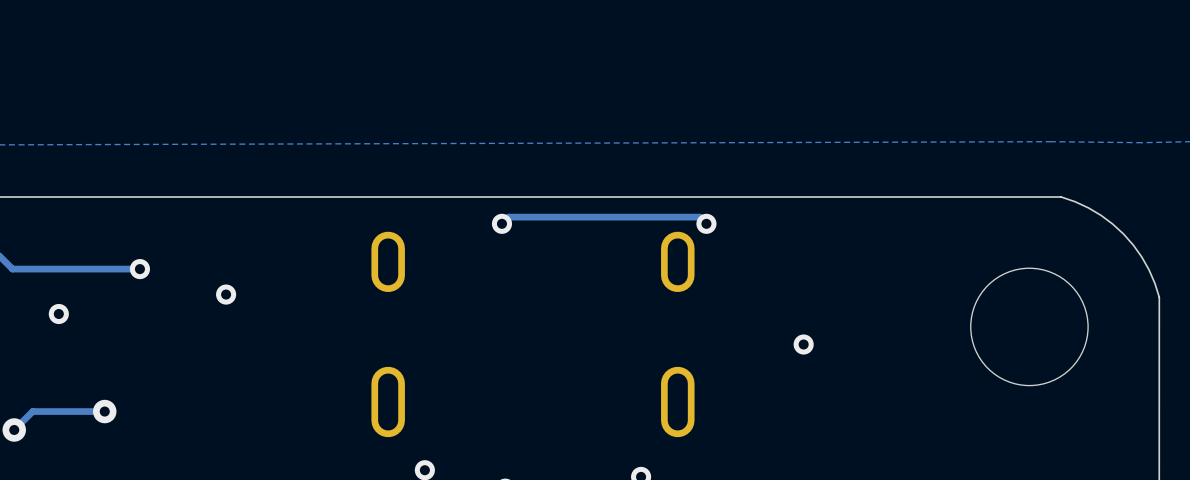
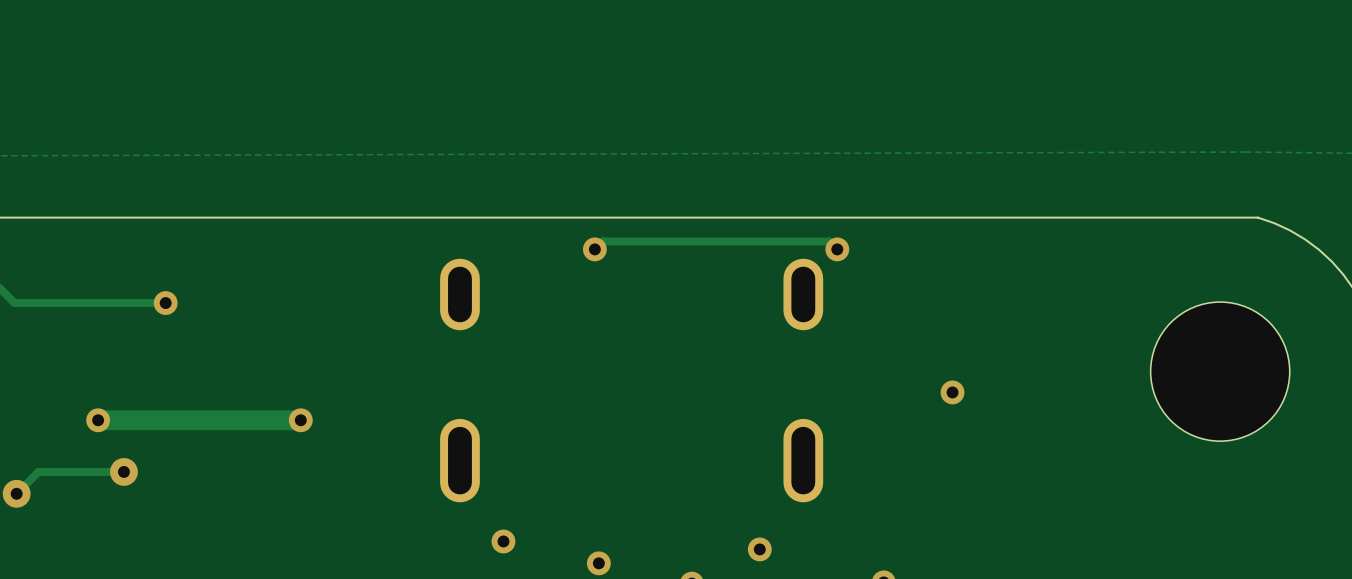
via position: (226, 294) -> (300, 420)
via position: (58, 314) -> (98, 420)
track: none -> (300, 420) (98, 420)

